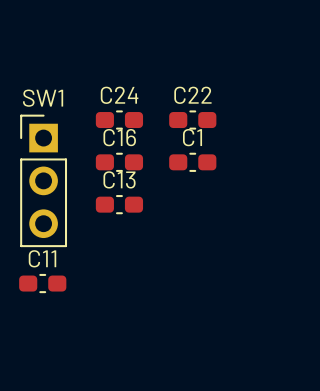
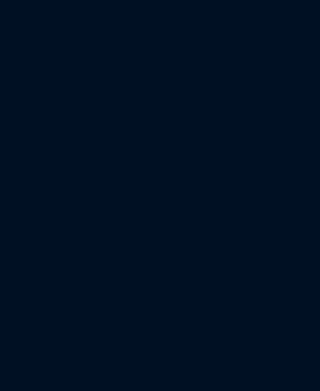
C24: (119, 120) -> none
C22: (192, 120) -> none
C16: (119, 162) -> none
C1: (192, 162) -> none
SW1: (43, 180) -> none
C13: (119, 204) -> none
C11: (42, 283) -> none

